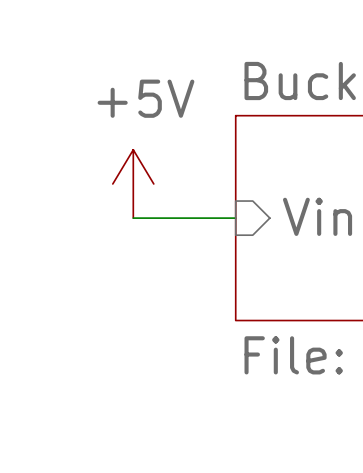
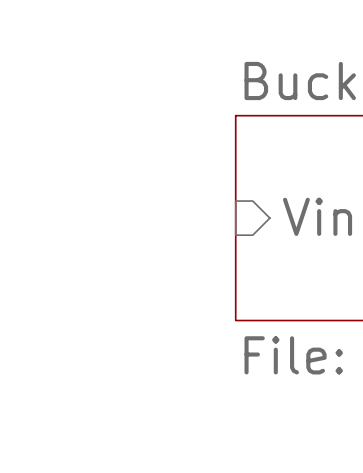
power symbol: +5V (133, 183) -> none
wire: (133, 218) (235, 218) -> none

